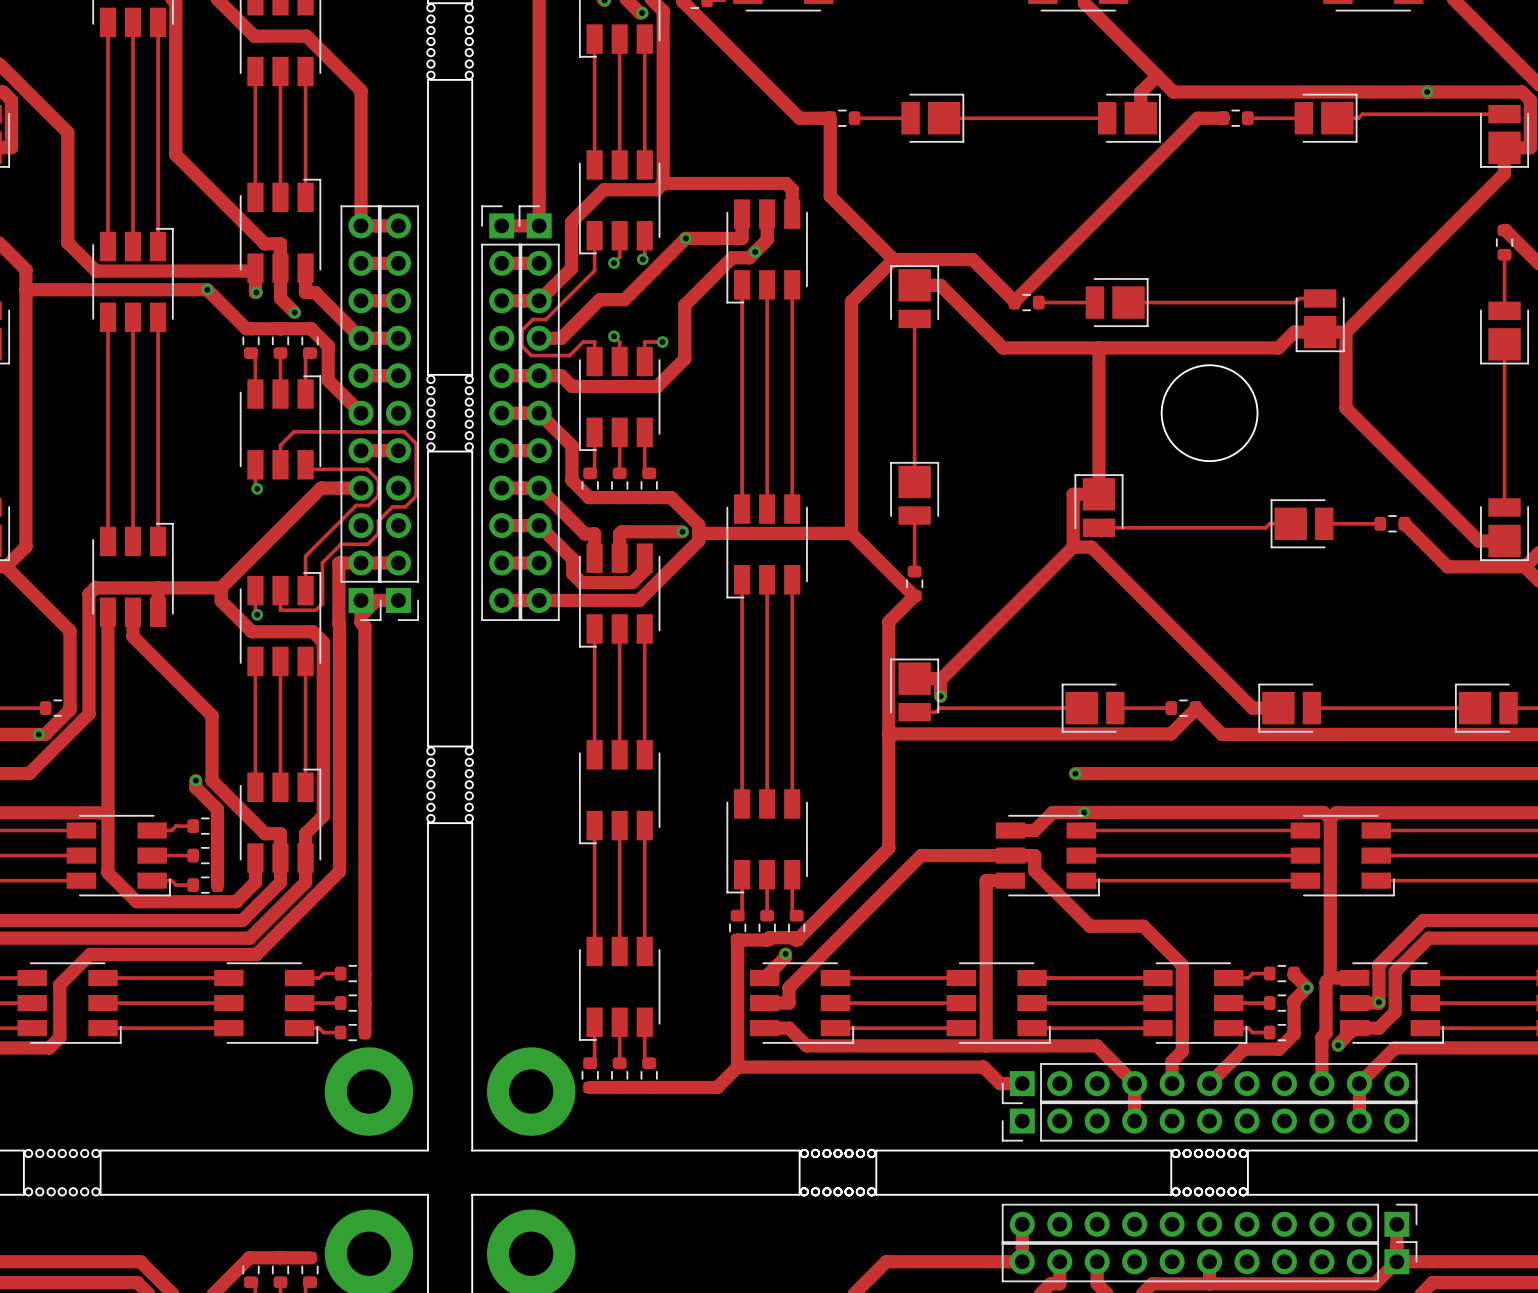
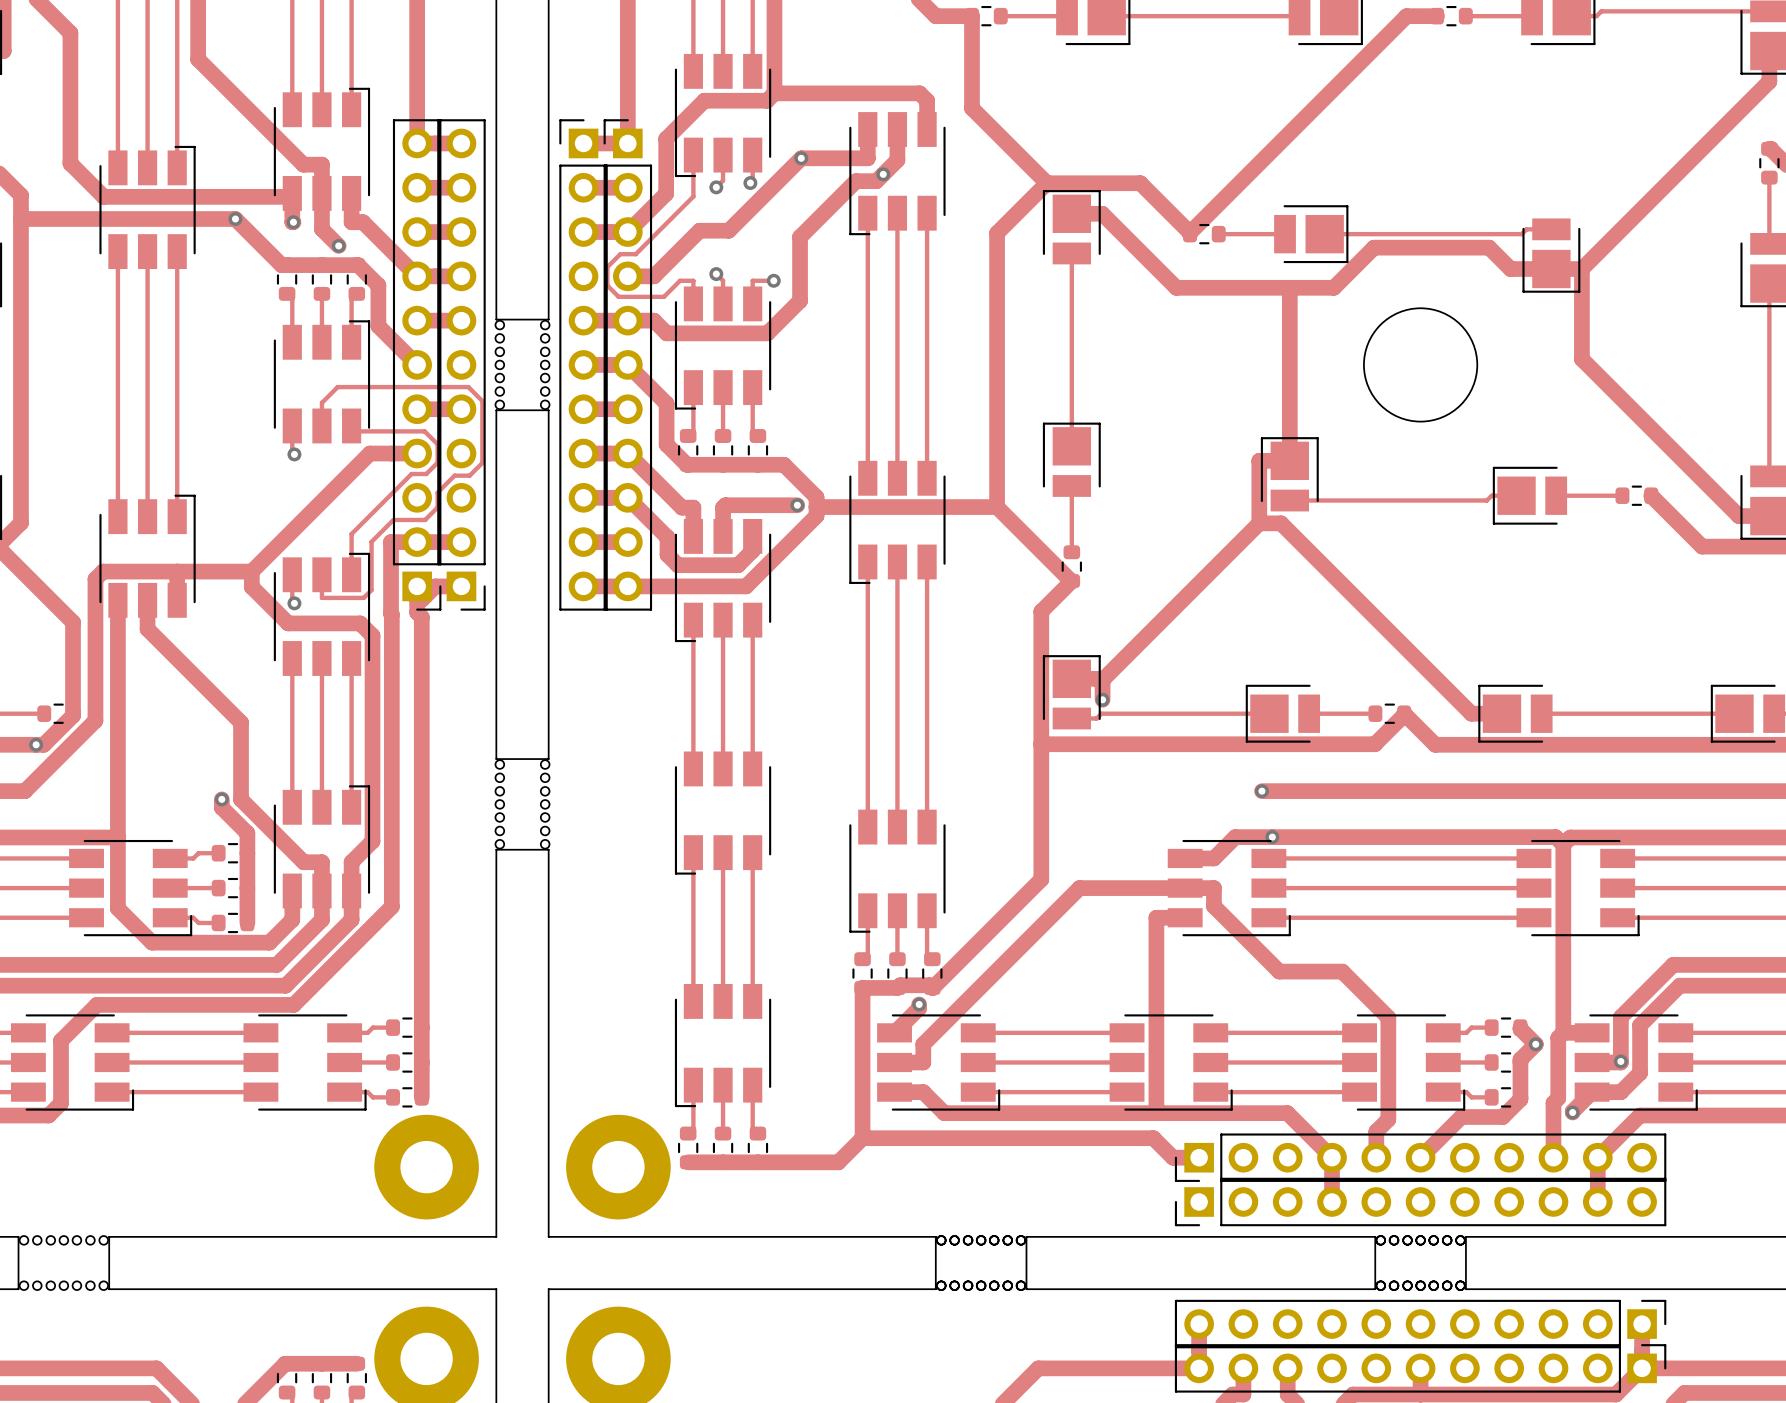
track: (1294, 332) (1278, 347) (1136, 347) -> (1520, 269) (1510, 269) (1489, 247) (1374, 247) (1333, 287)

